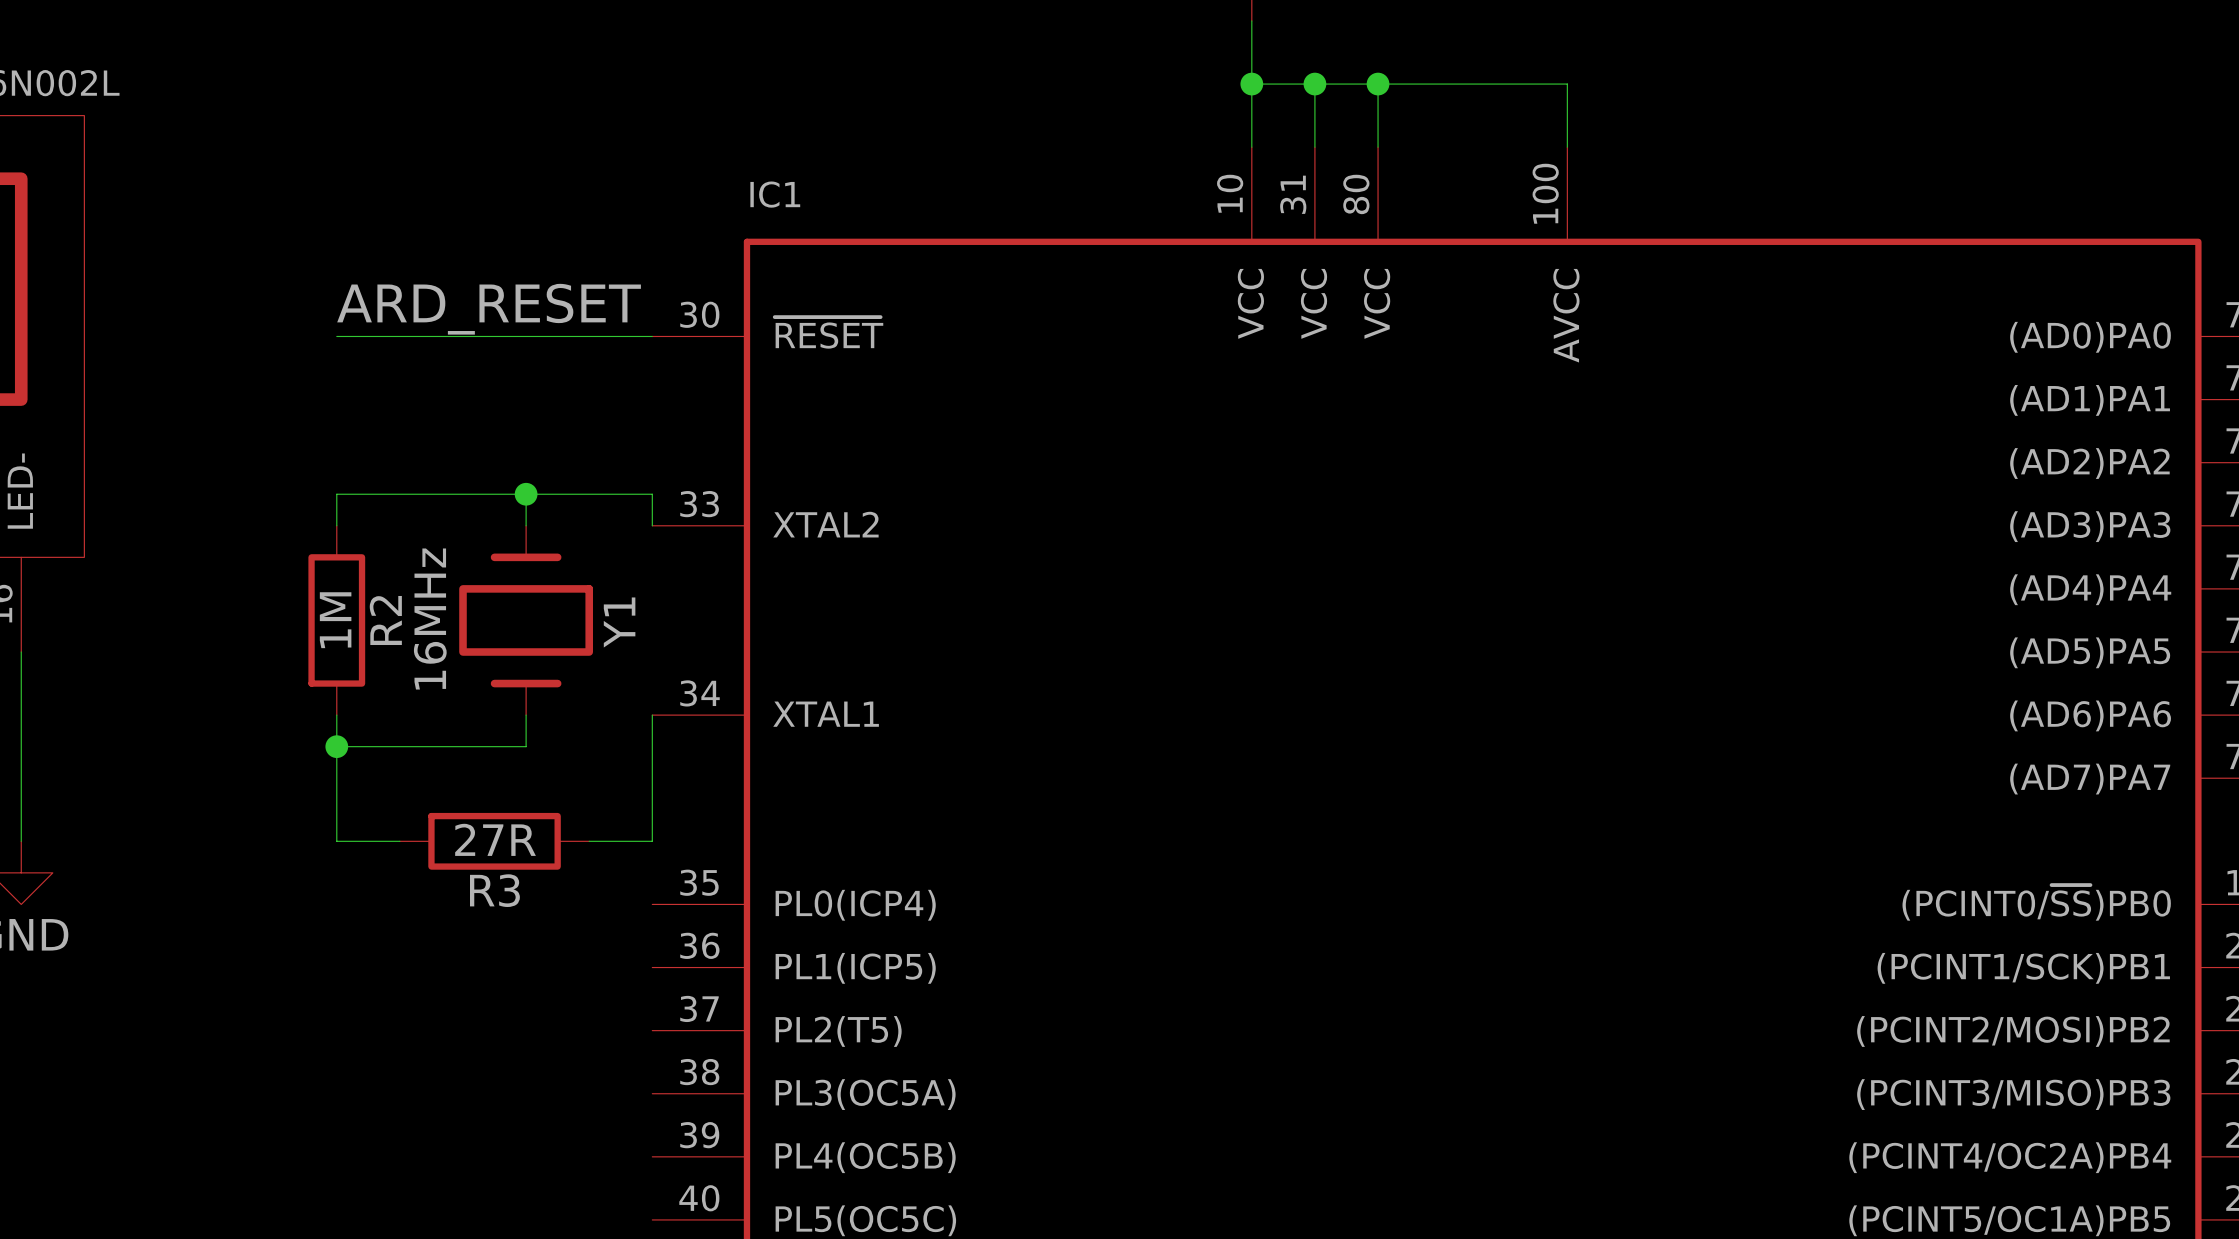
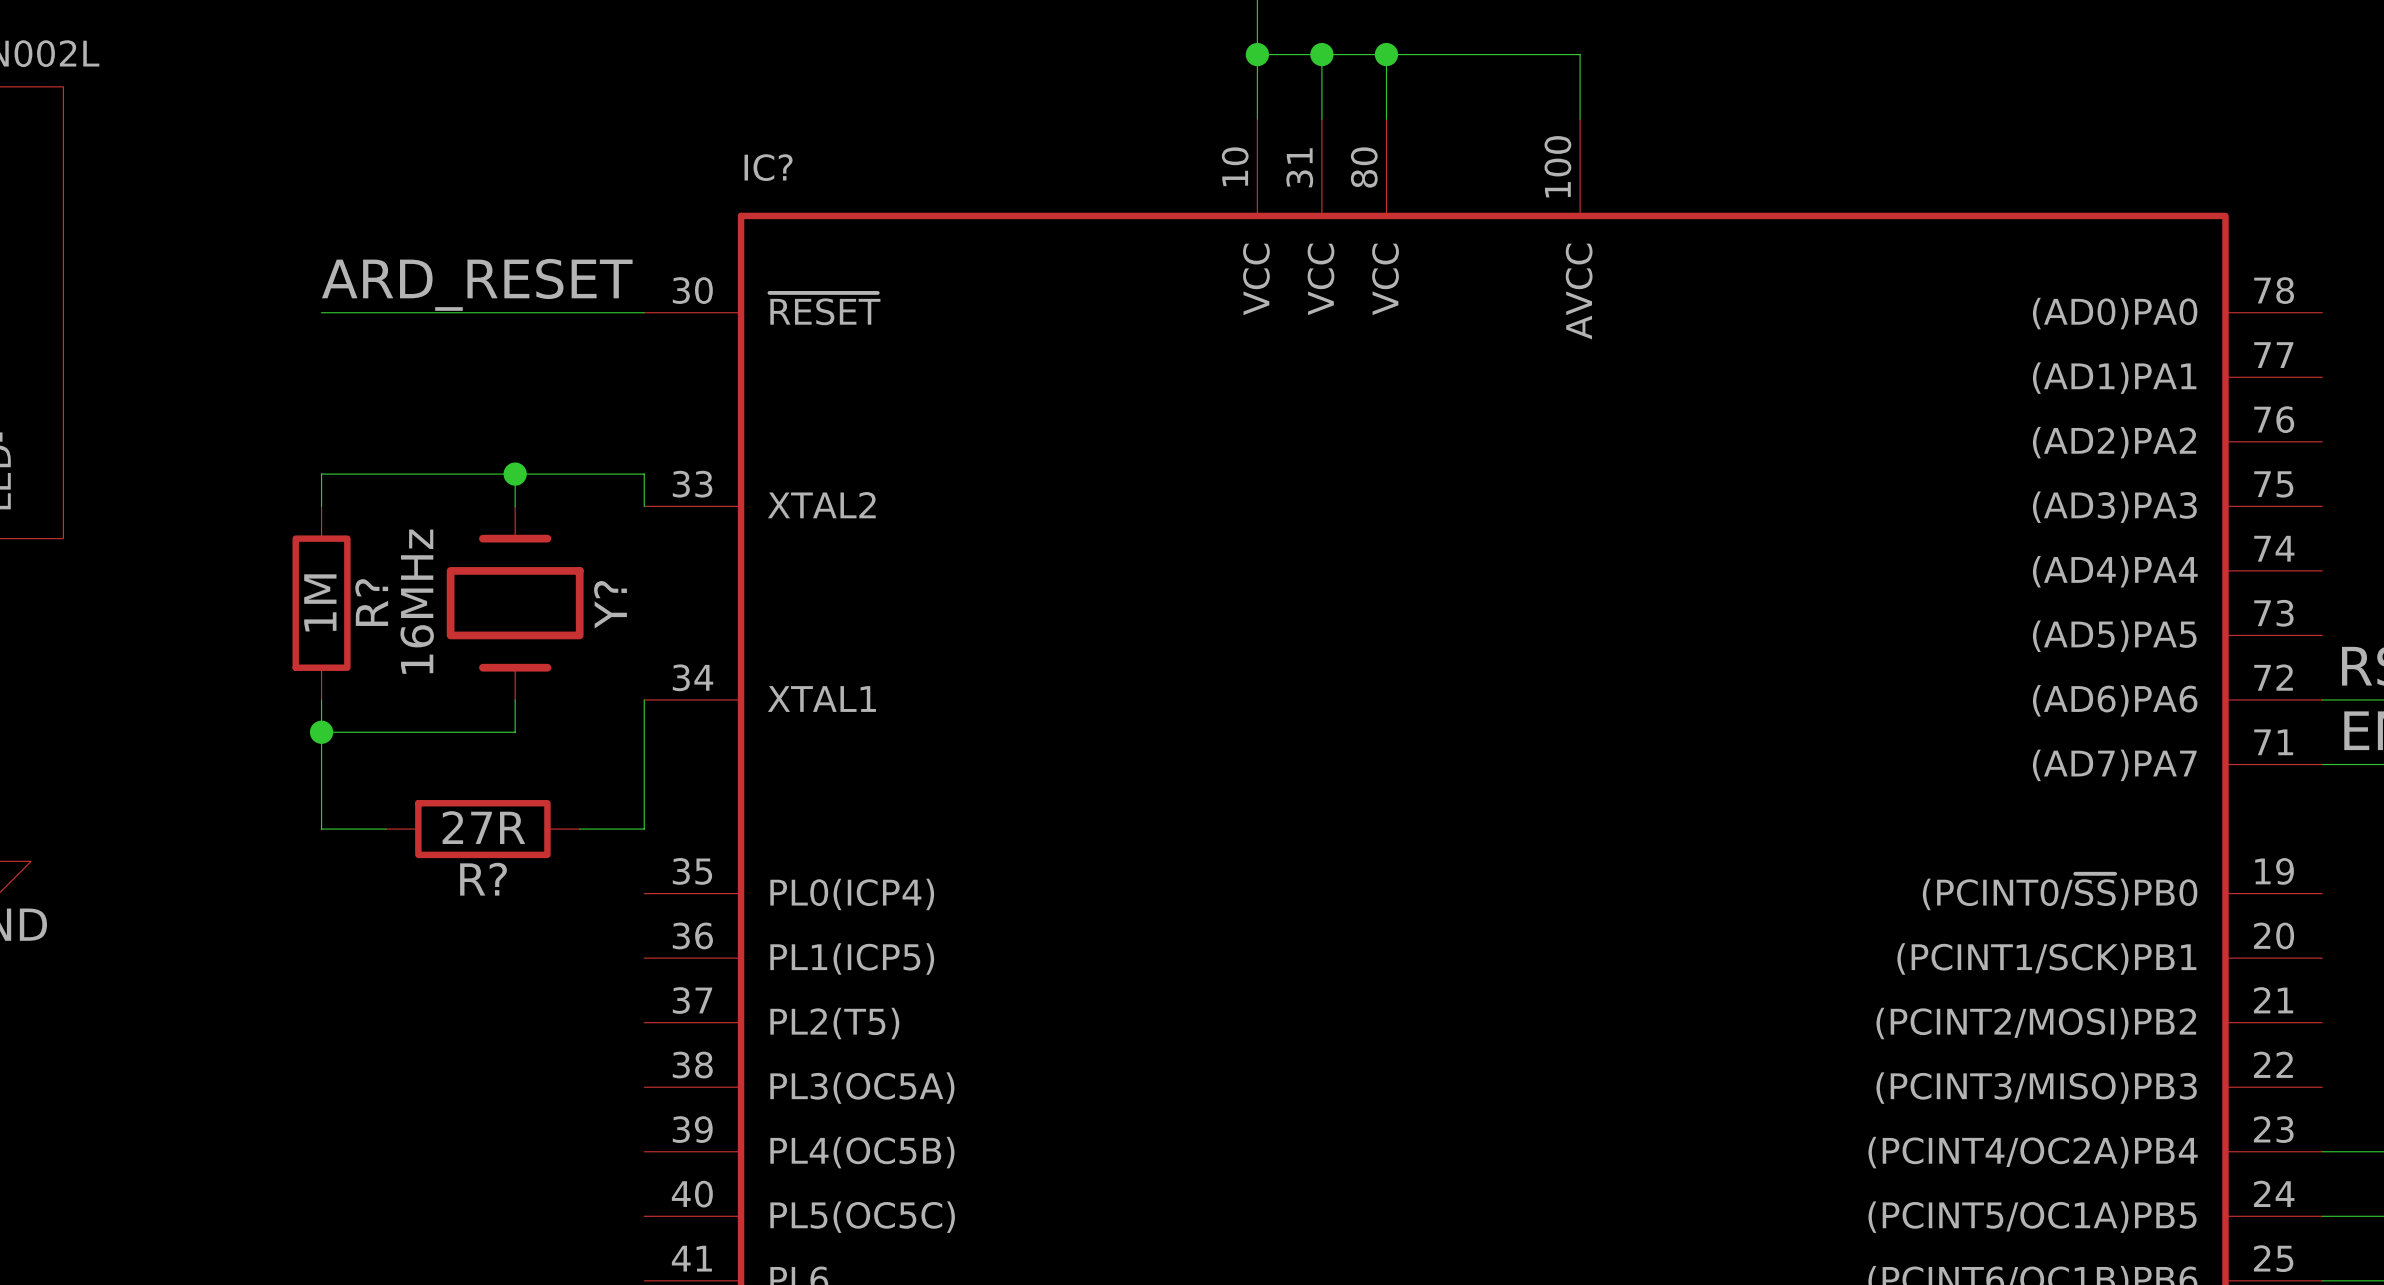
IC1 name: IC1 (775, 194) -> IC? (768, 167)
R2 name: R2 (385, 620) -> R? (371, 602)
Y1 name: Y1 (619, 622) -> Y? (610, 604)
R3 name: R3 (494, 890) -> R? (483, 879)

